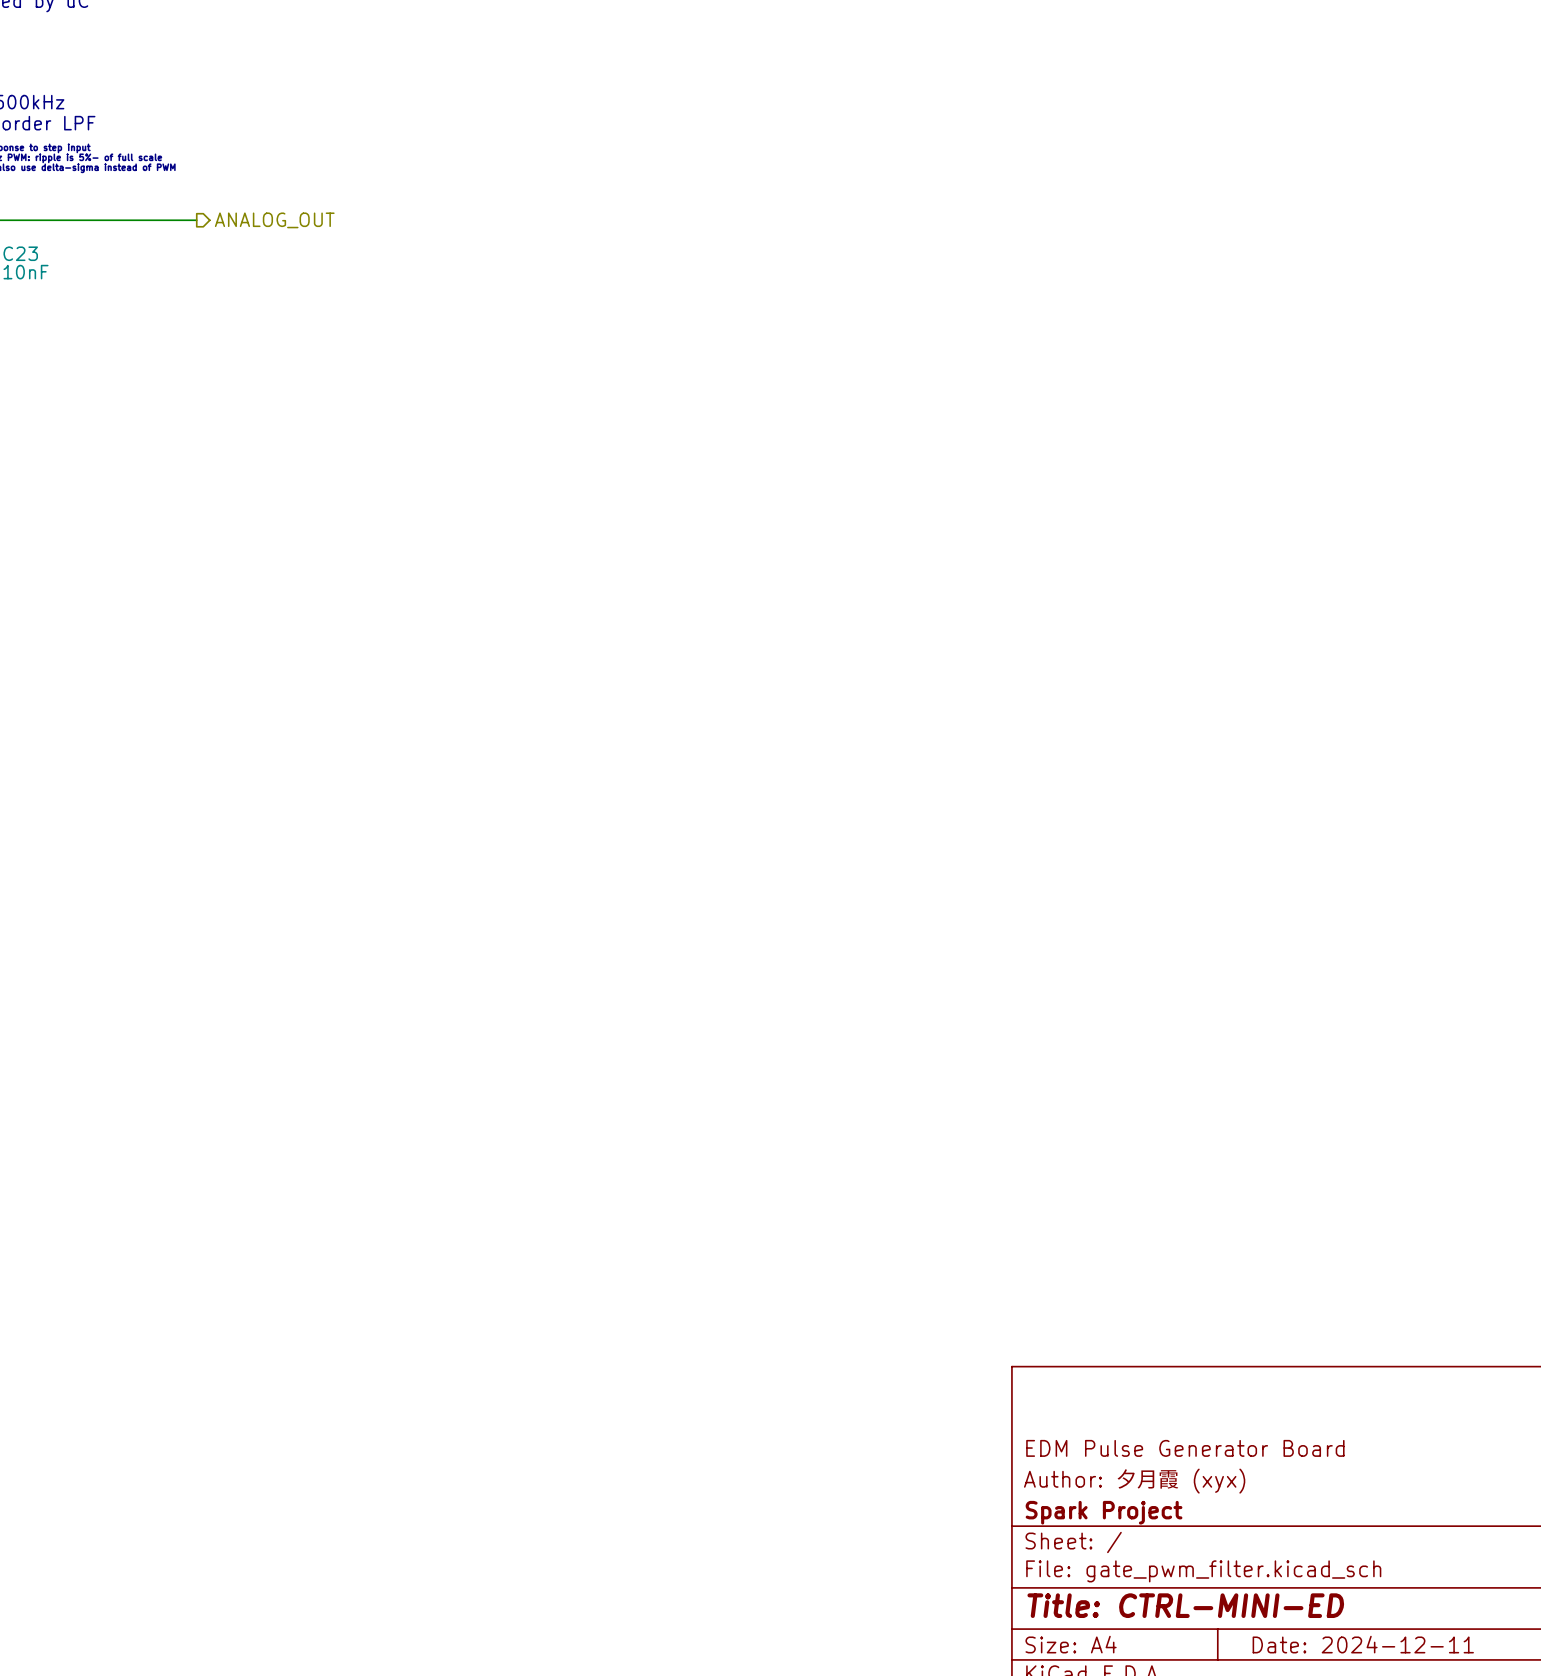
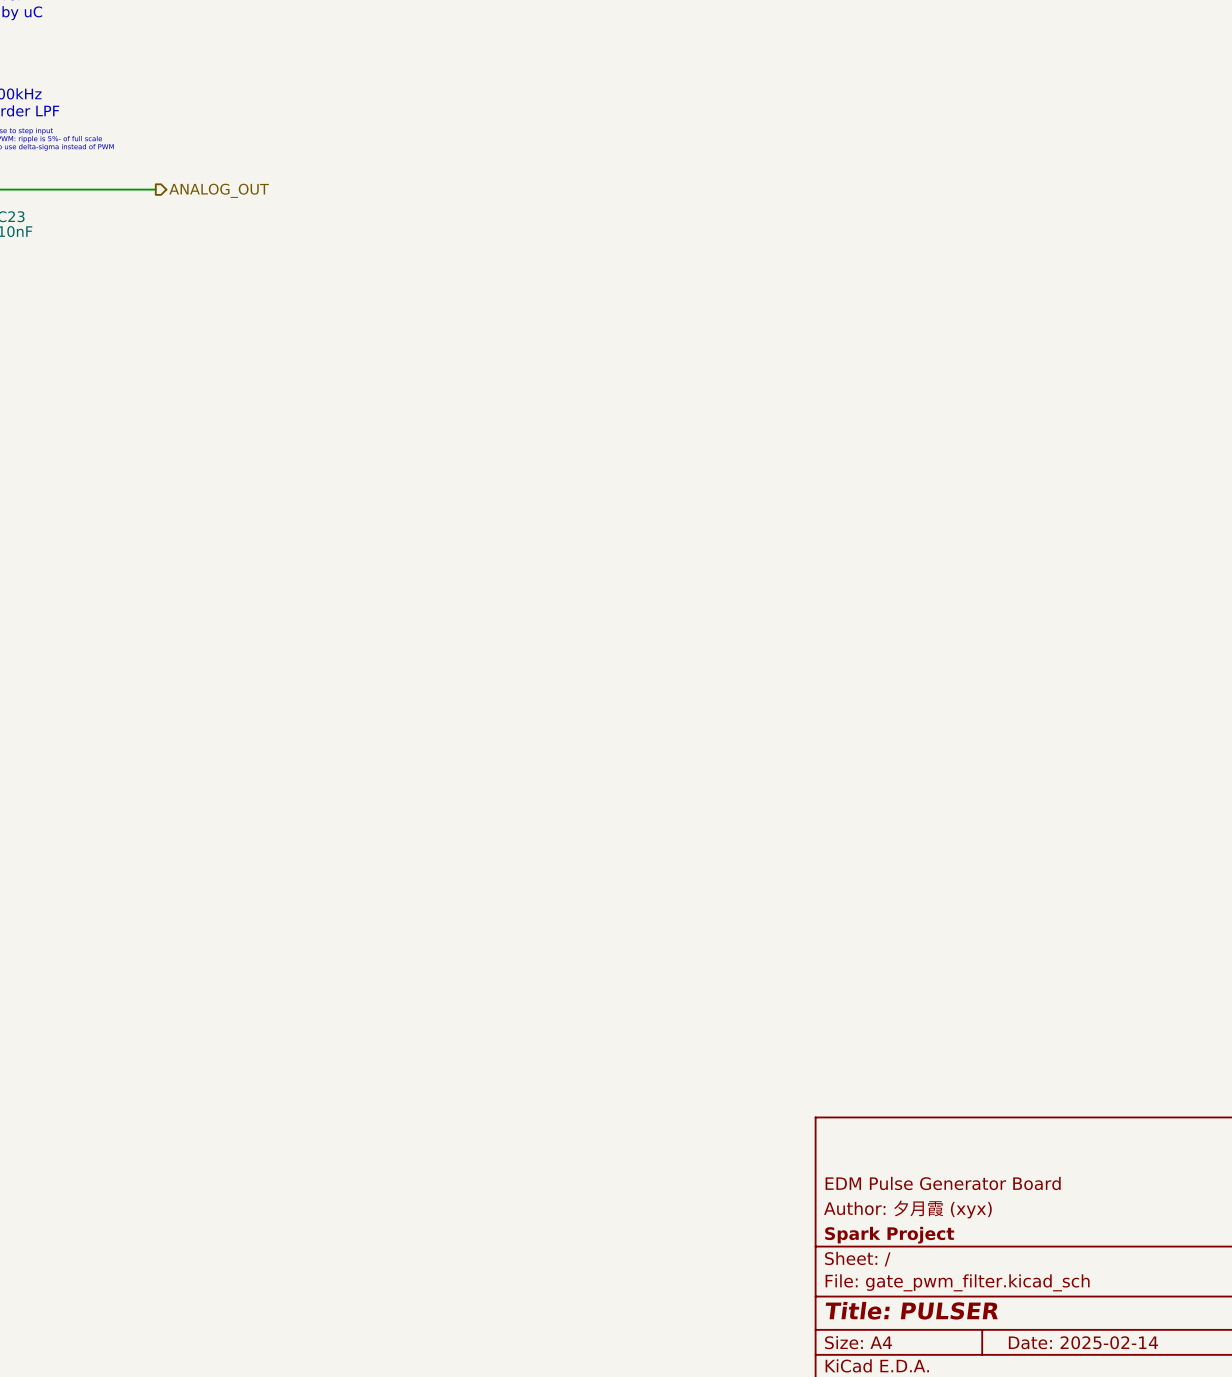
title block: Title: CTRL-MINI-ED (1185, 1605) -> Title: PULSER (911, 1310)
title block: Date: 2024-12-11 (1363, 1644) -> Date: 2025-02-14 (1083, 1342)

